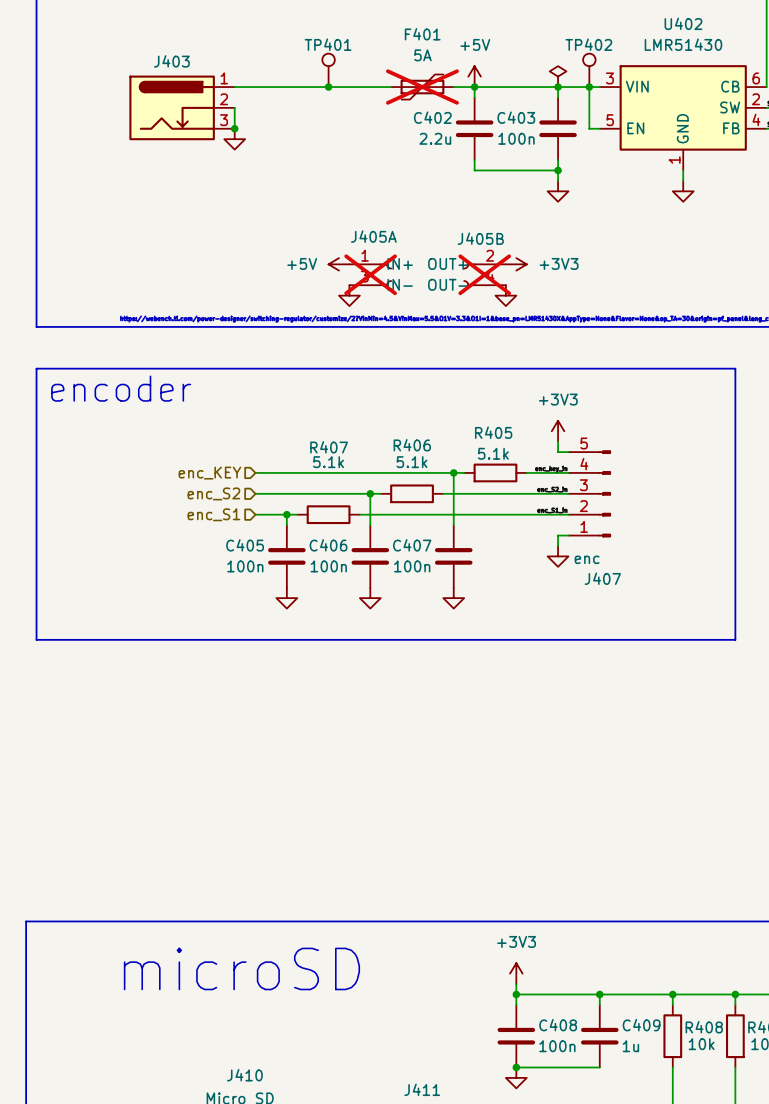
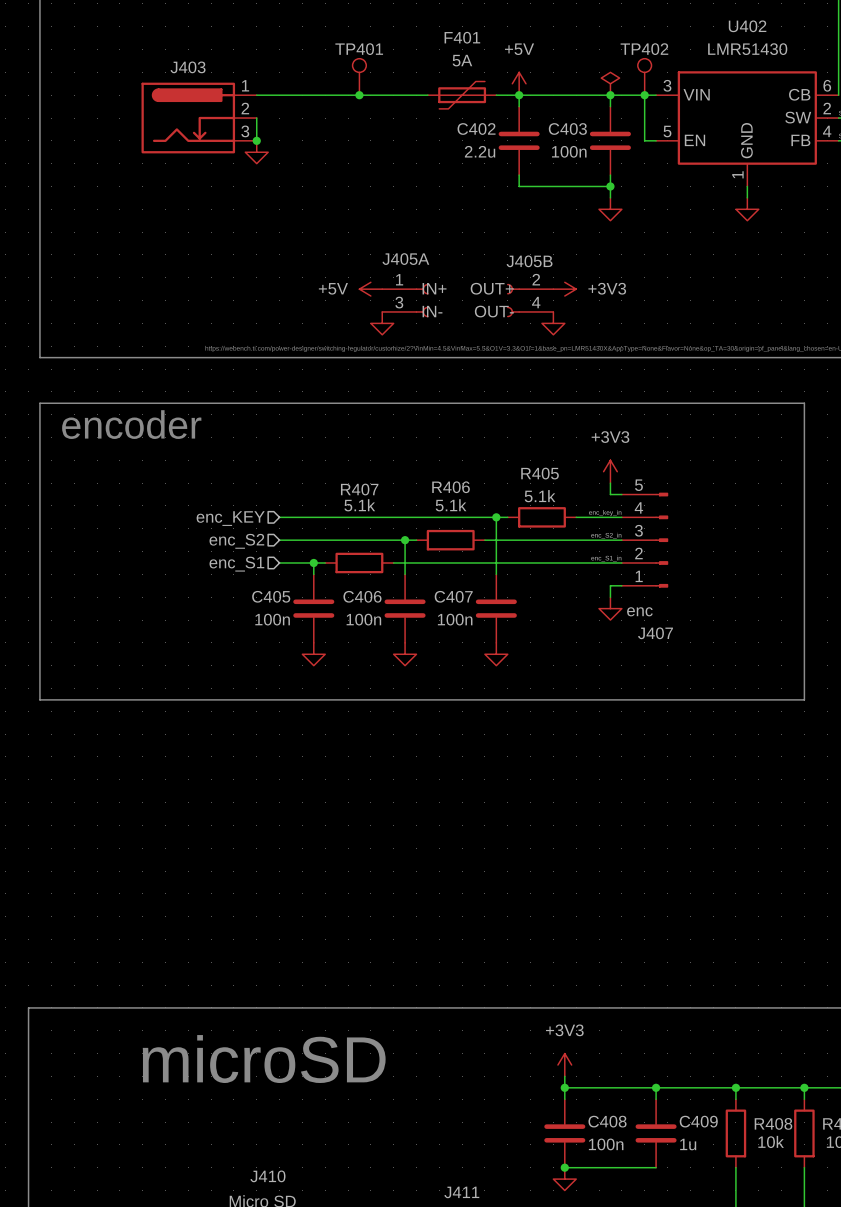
F401 do-not-place cross: (422, 87) -> none
J405A do-not-place cross: (370, 274) -> none
J405B do-not-place cross: (484, 274) -> none

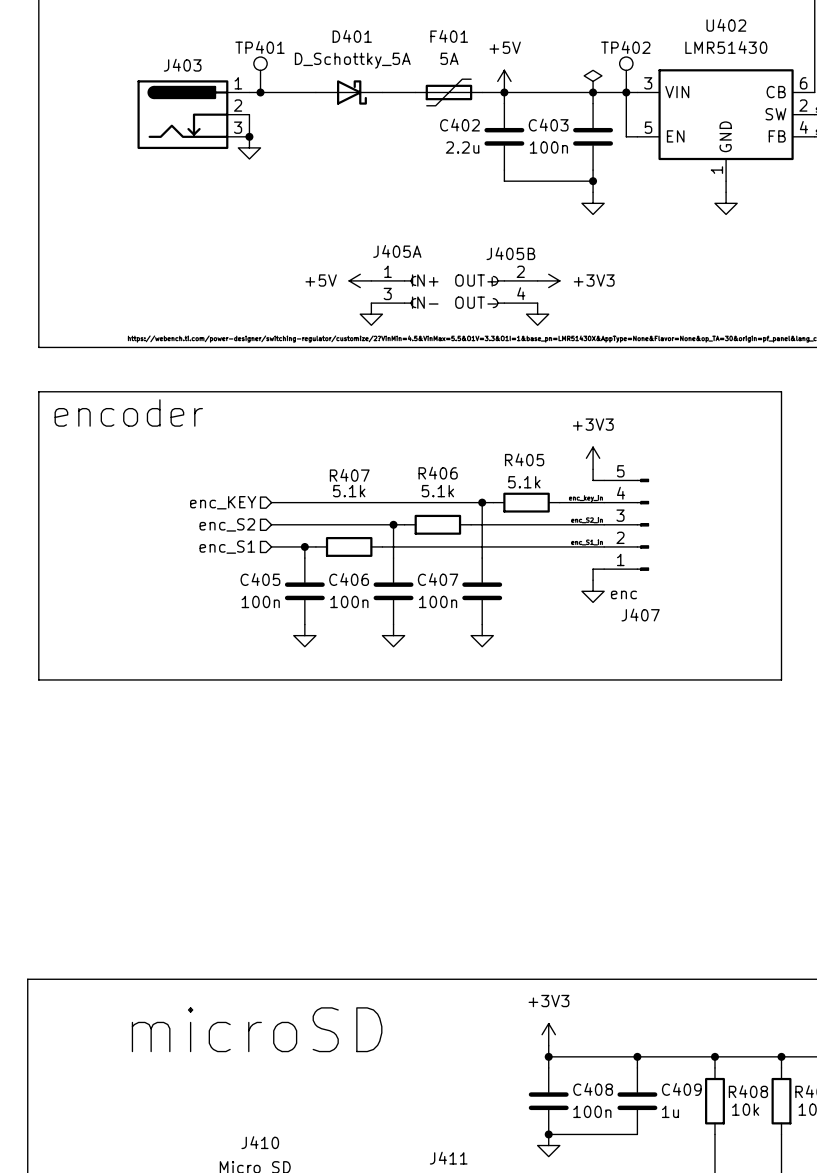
TP401 position: (359, 76) -> (260, 74)
junction: none -> (260, 92)
junction: (359, 95) -> none
D401: none -> D_Schottky_5A (349, 92)

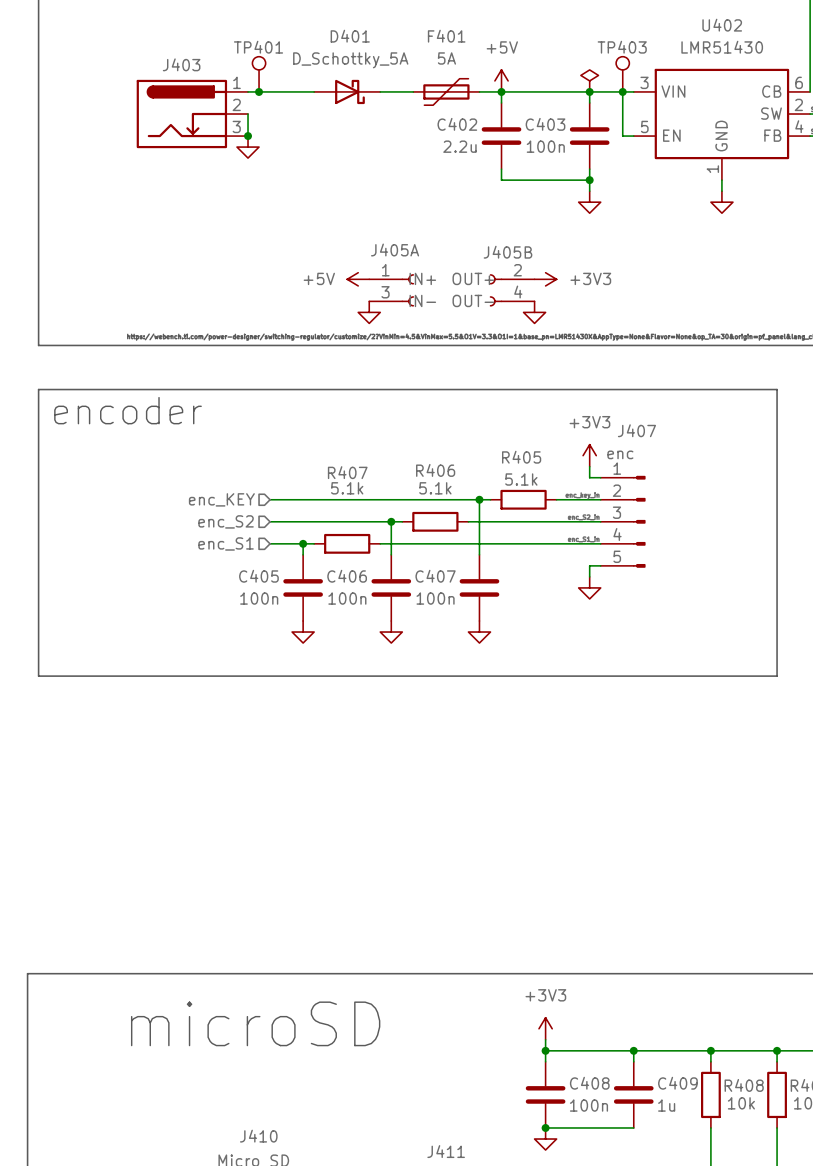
TP402 name: TP402 (625, 47) -> TP403 (622, 47)
J407 flip: as is (642, 524) -> up-down (639, 521)

